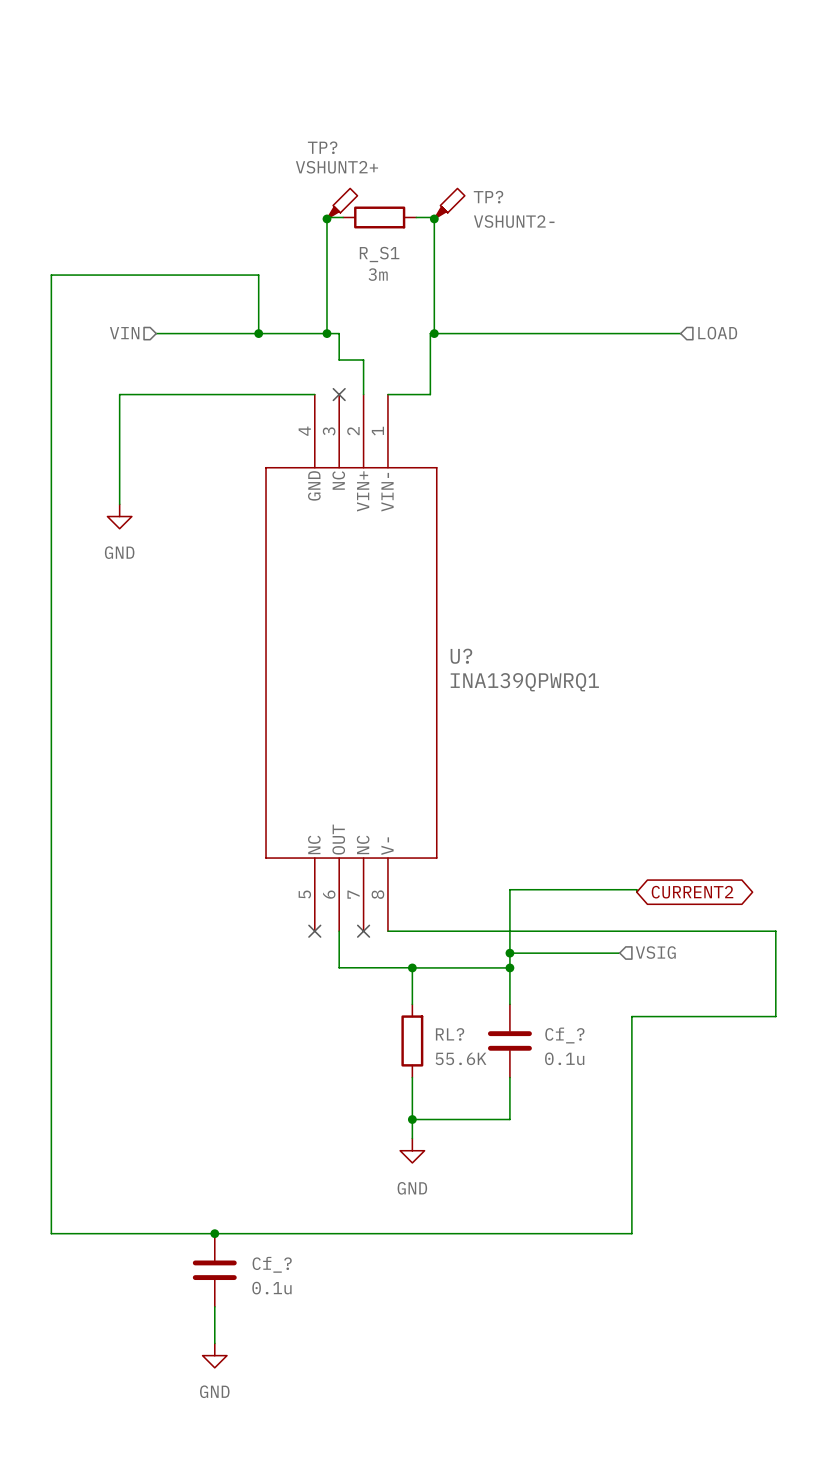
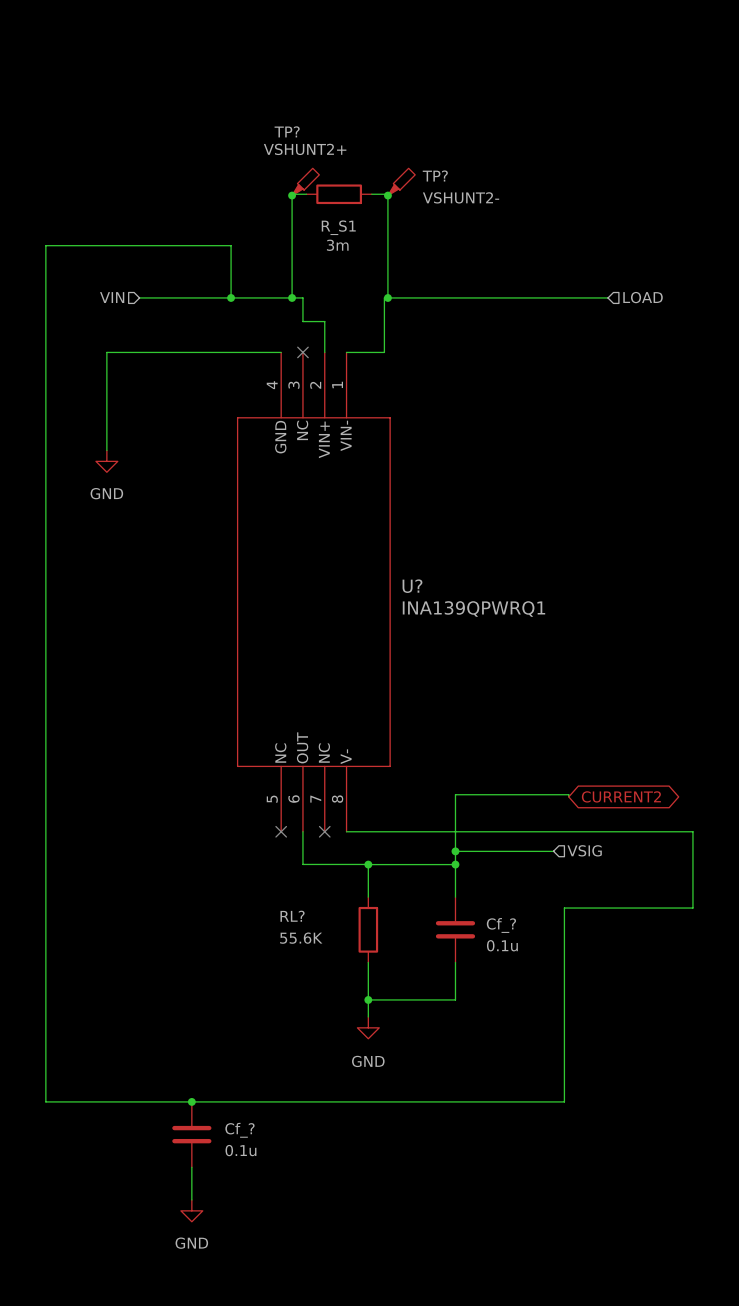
RL? name position: RL? (450, 1034) -> RL? (292, 916)
RL? value position: 55.6K (460, 1058) -> 55.6K (301, 938)

